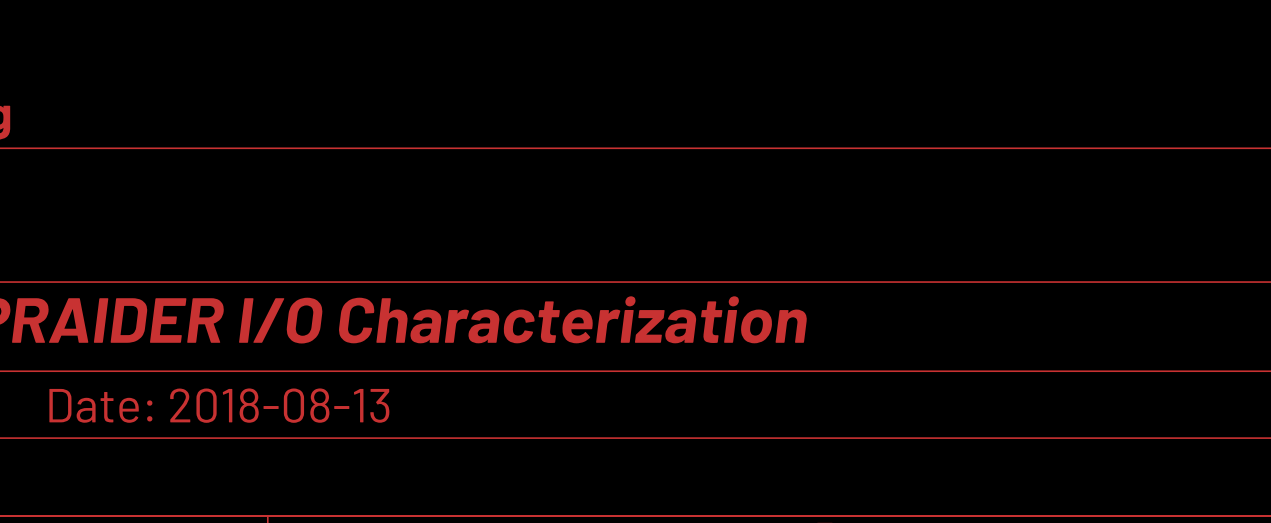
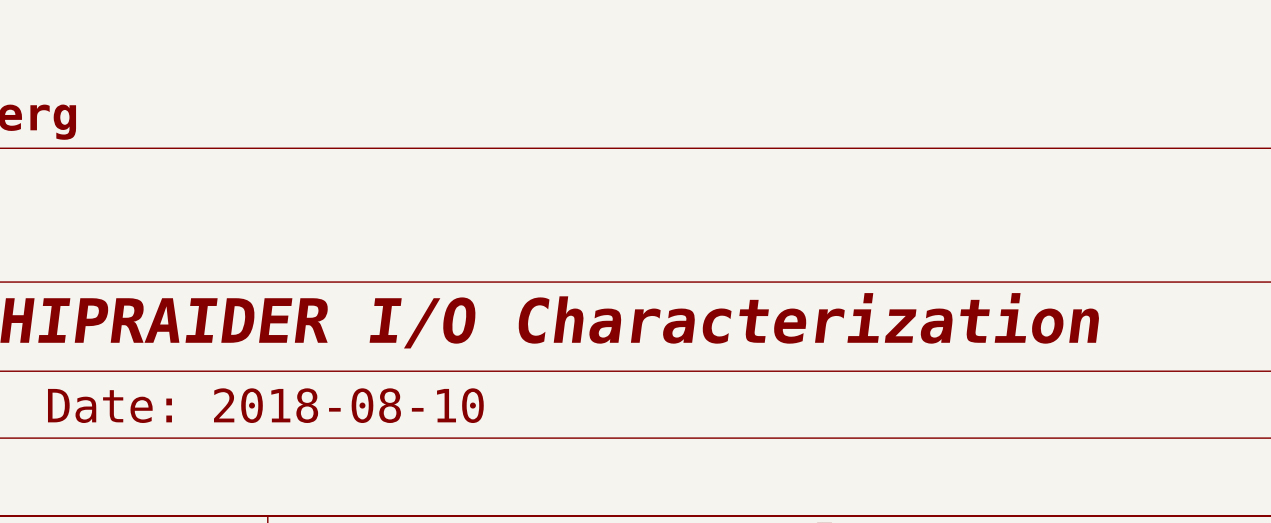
title block: Date: 2018-08-13 (219, 405) -> Date: 2018-08-10 (265, 405)

